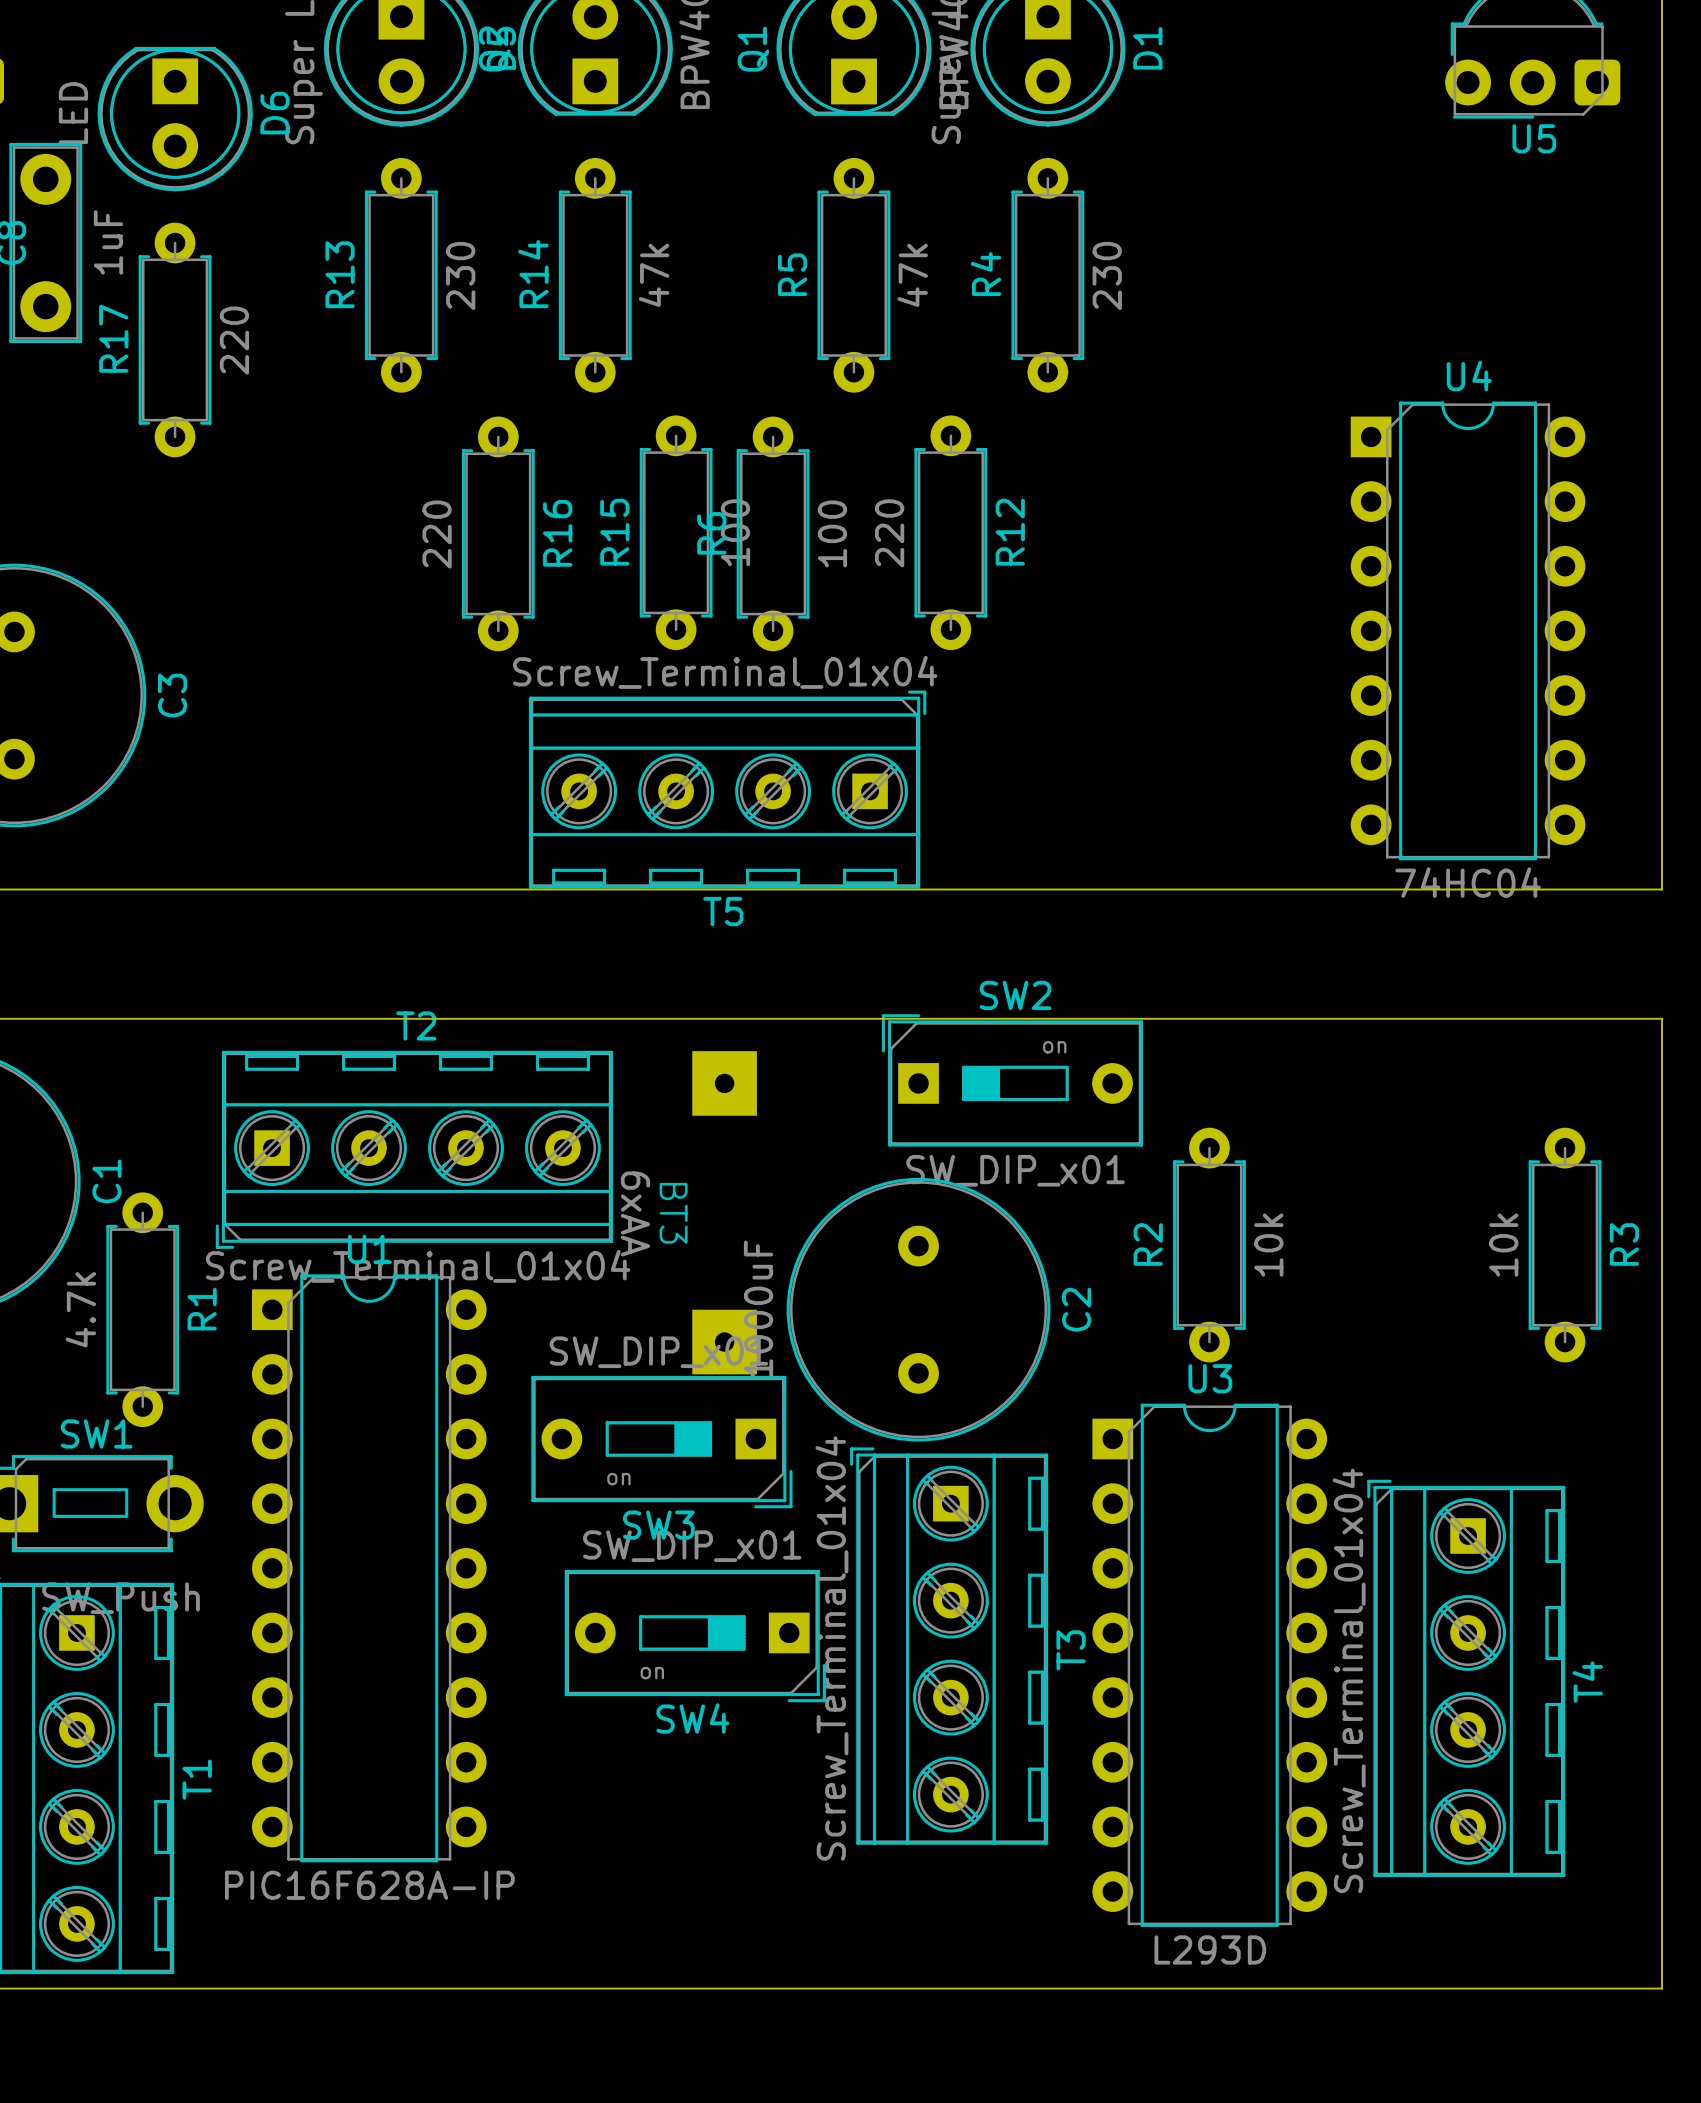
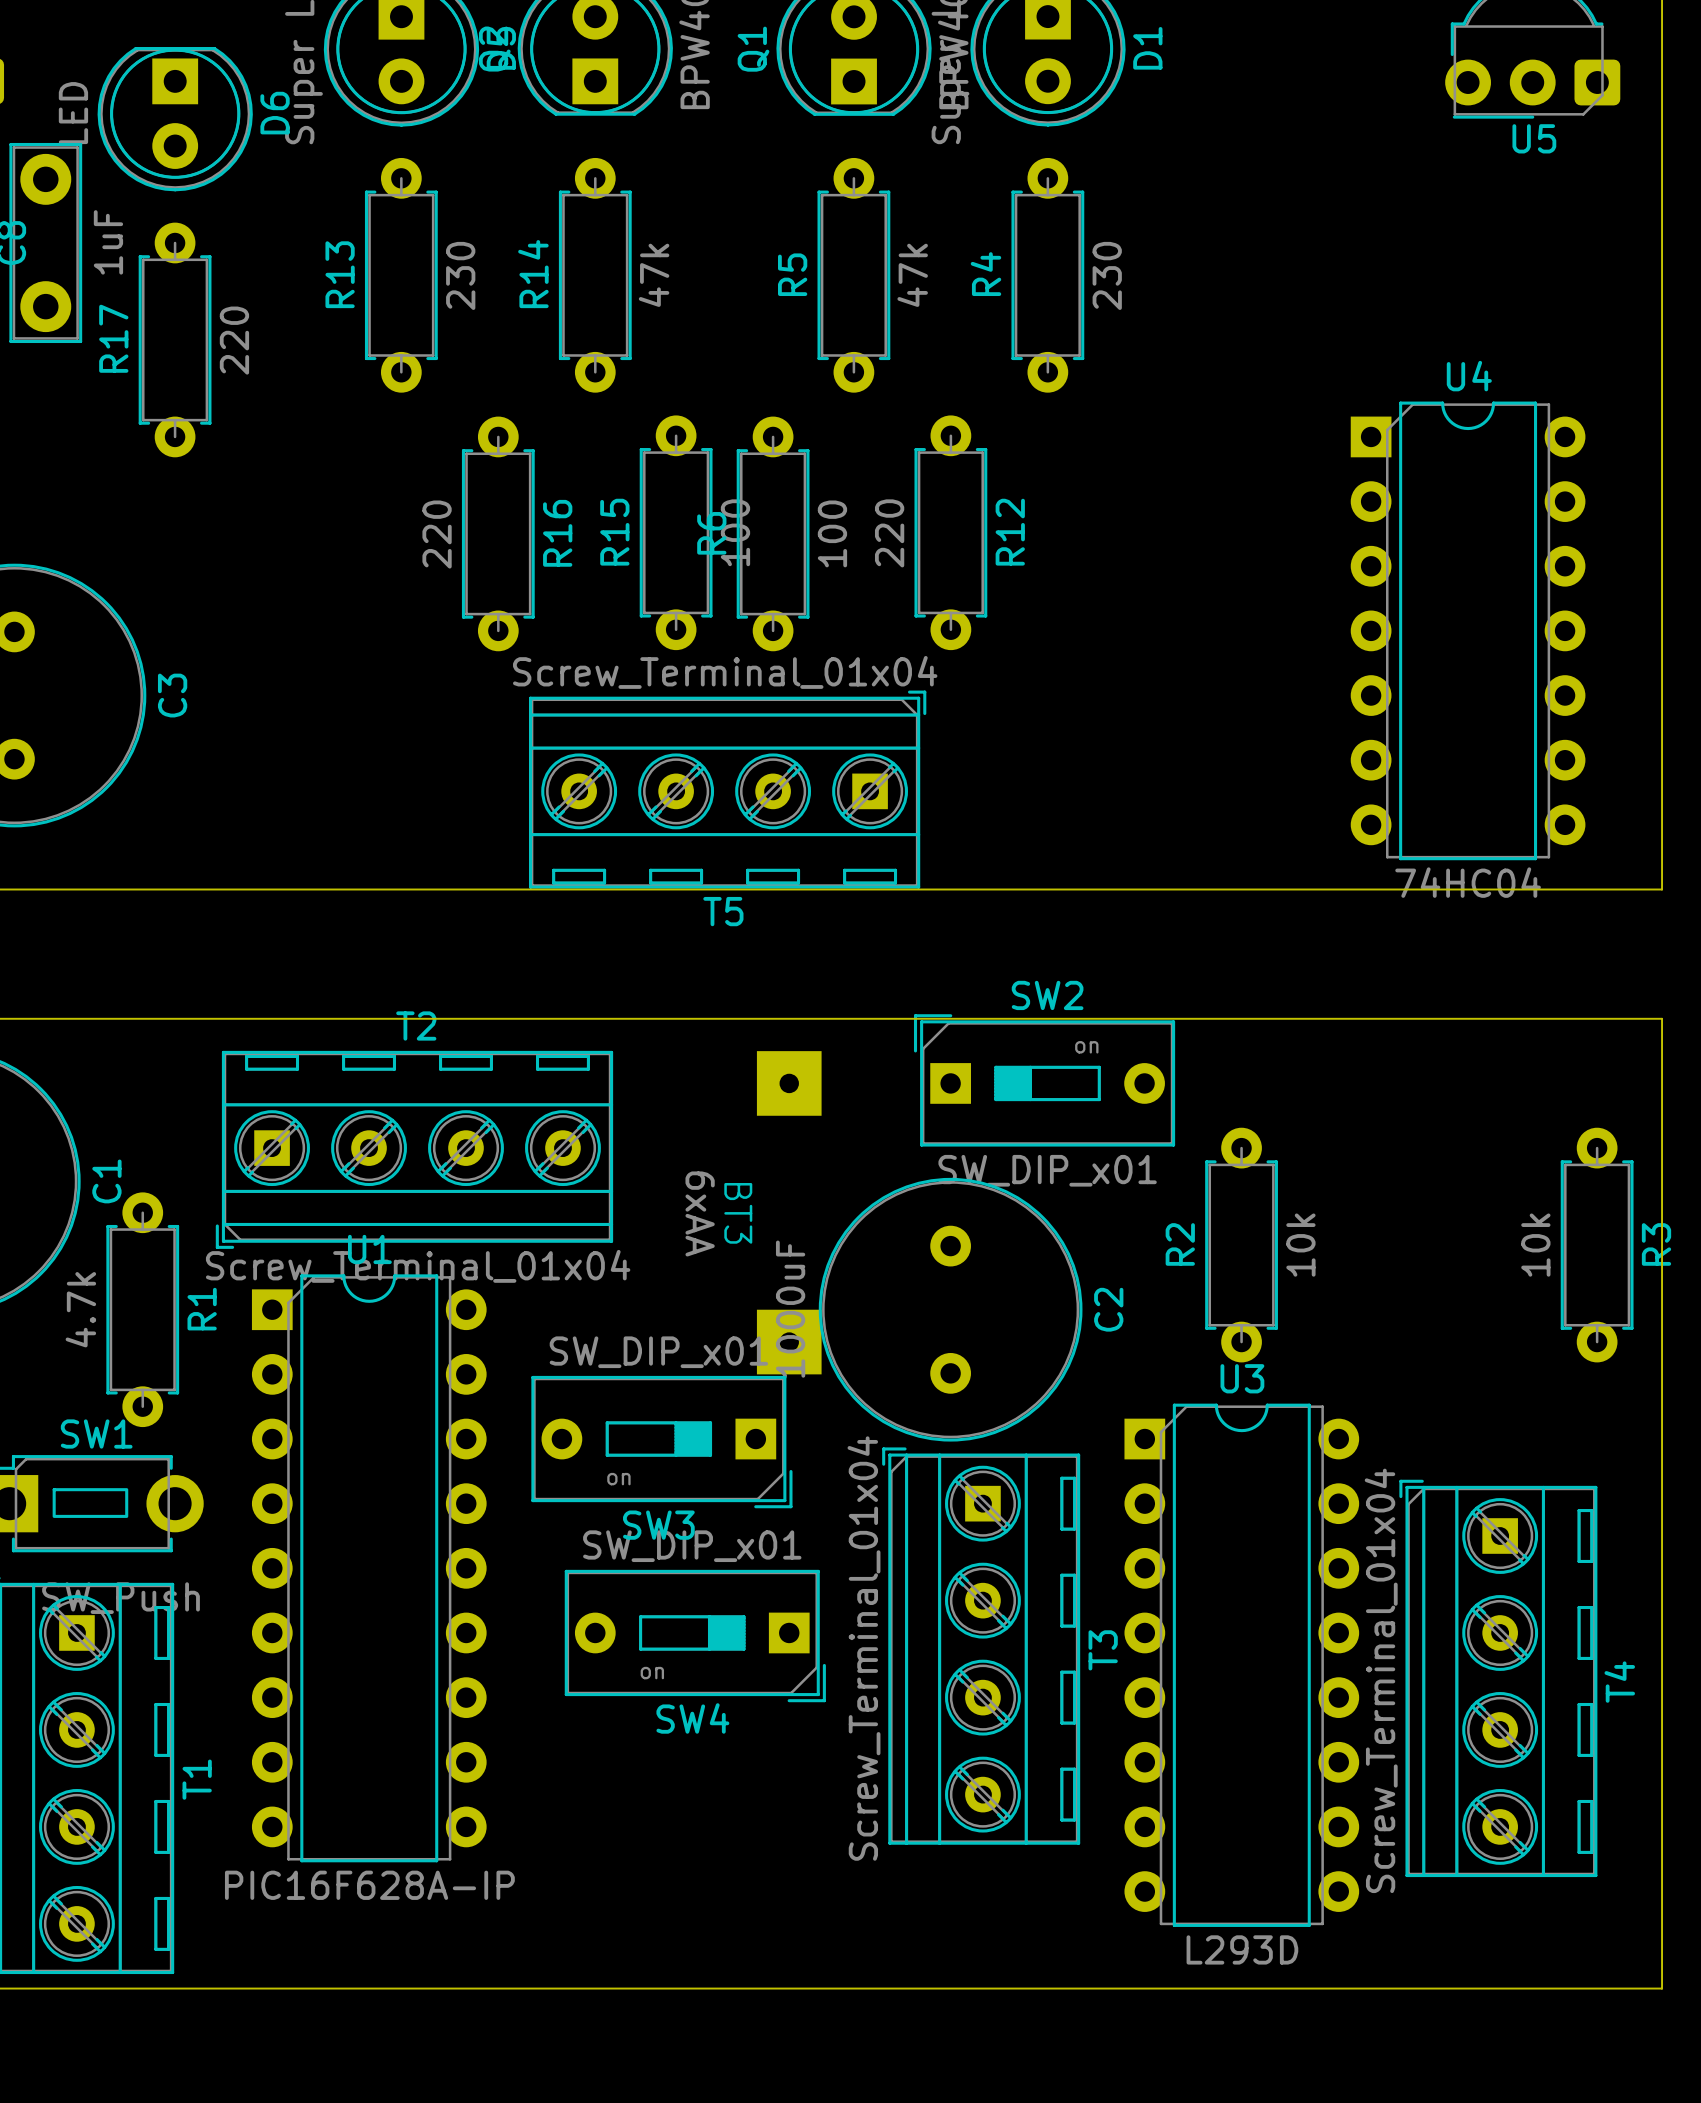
SW2 position: (1012, 1080) -> (1044, 1080)
BT3 position: (724, 1212) -> (789, 1212)
R2 position: (1209, 1245) -> (1241, 1245)
R3 position: (1565, 1245) -> (1597, 1245)
C2 position: (918, 1309) -> (950, 1309)
T3 position: (949, 1646) -> (981, 1646)
U3 position: (1209, 1665) -> (1241, 1665)
T4 position: (1466, 1678) -> (1498, 1678)

